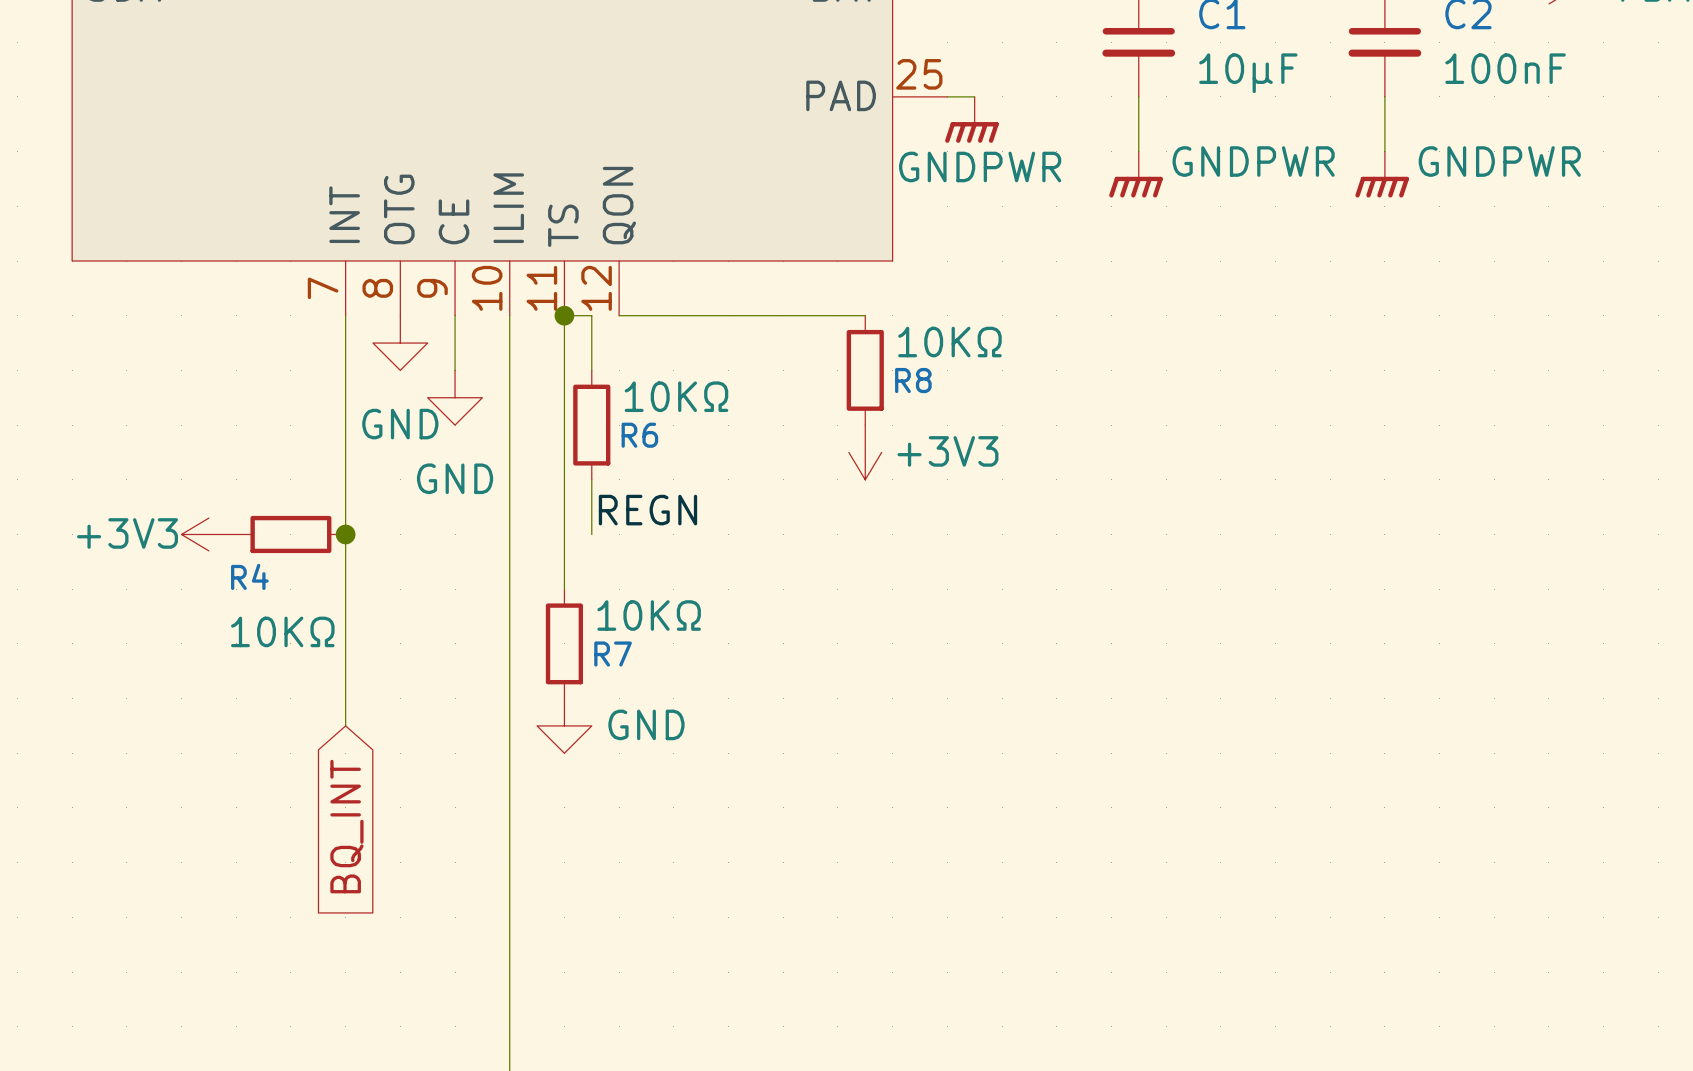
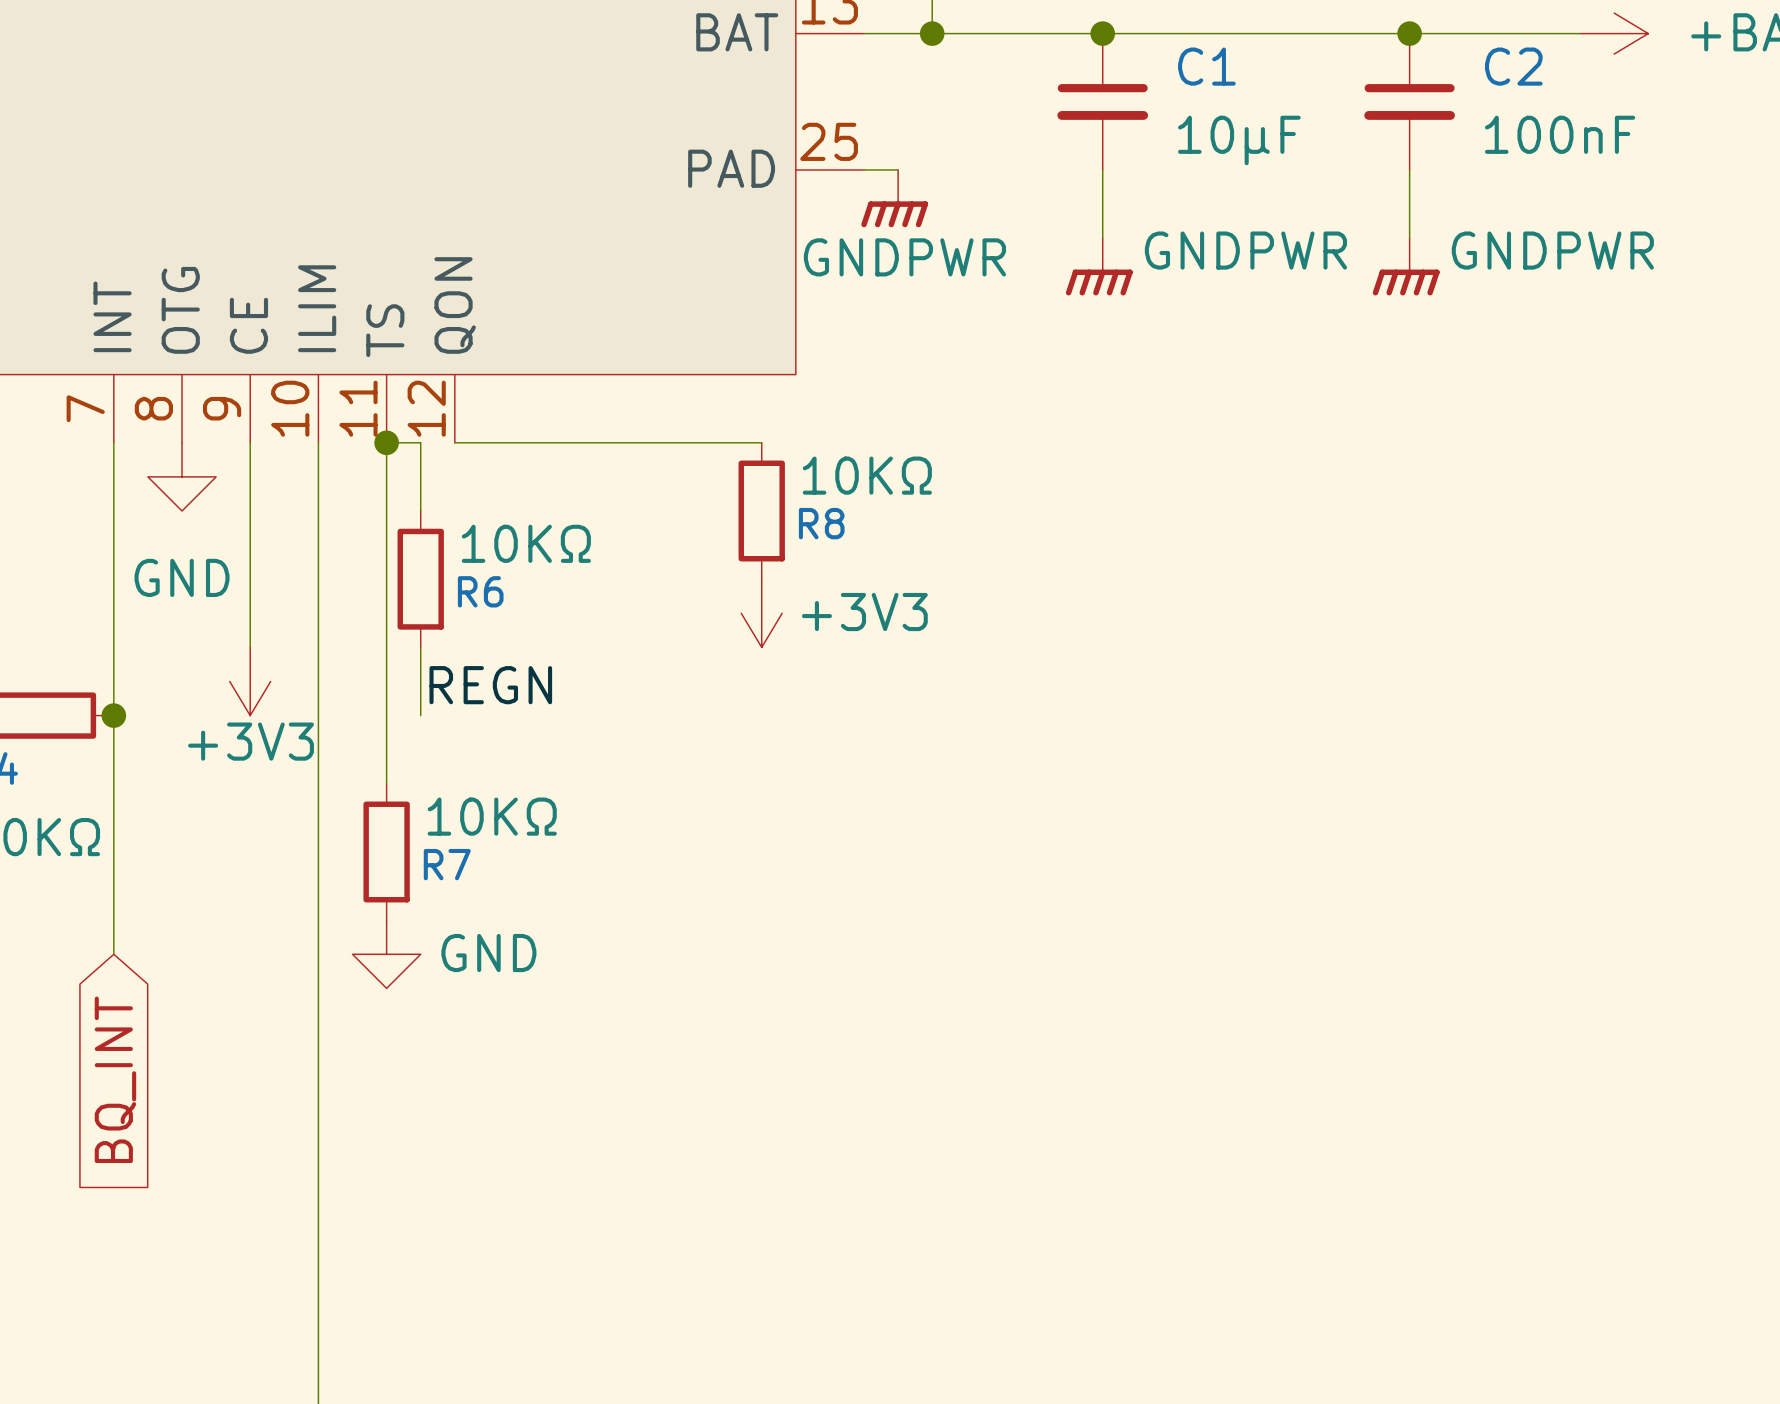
wire: none -> (250, 510) (250, 647)
power symbol: GND (455, 397) -> none
power symbol: none -> +3V3 (250, 681)

